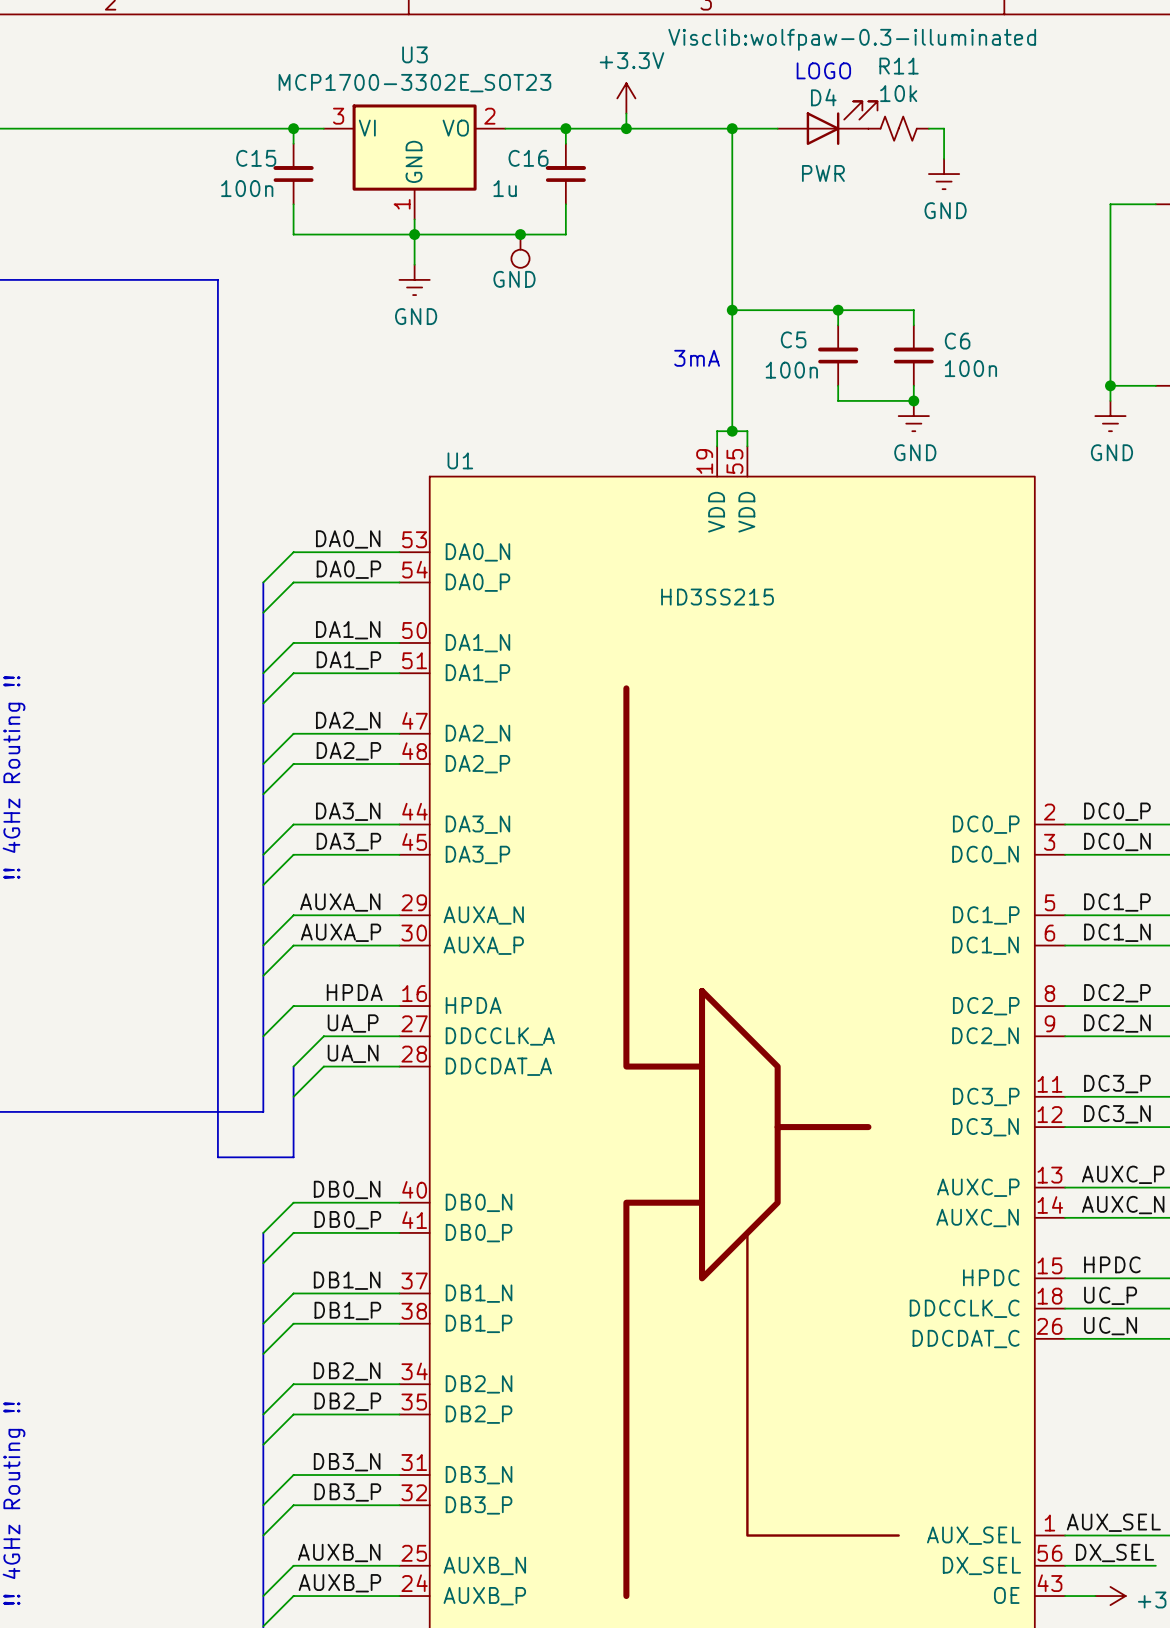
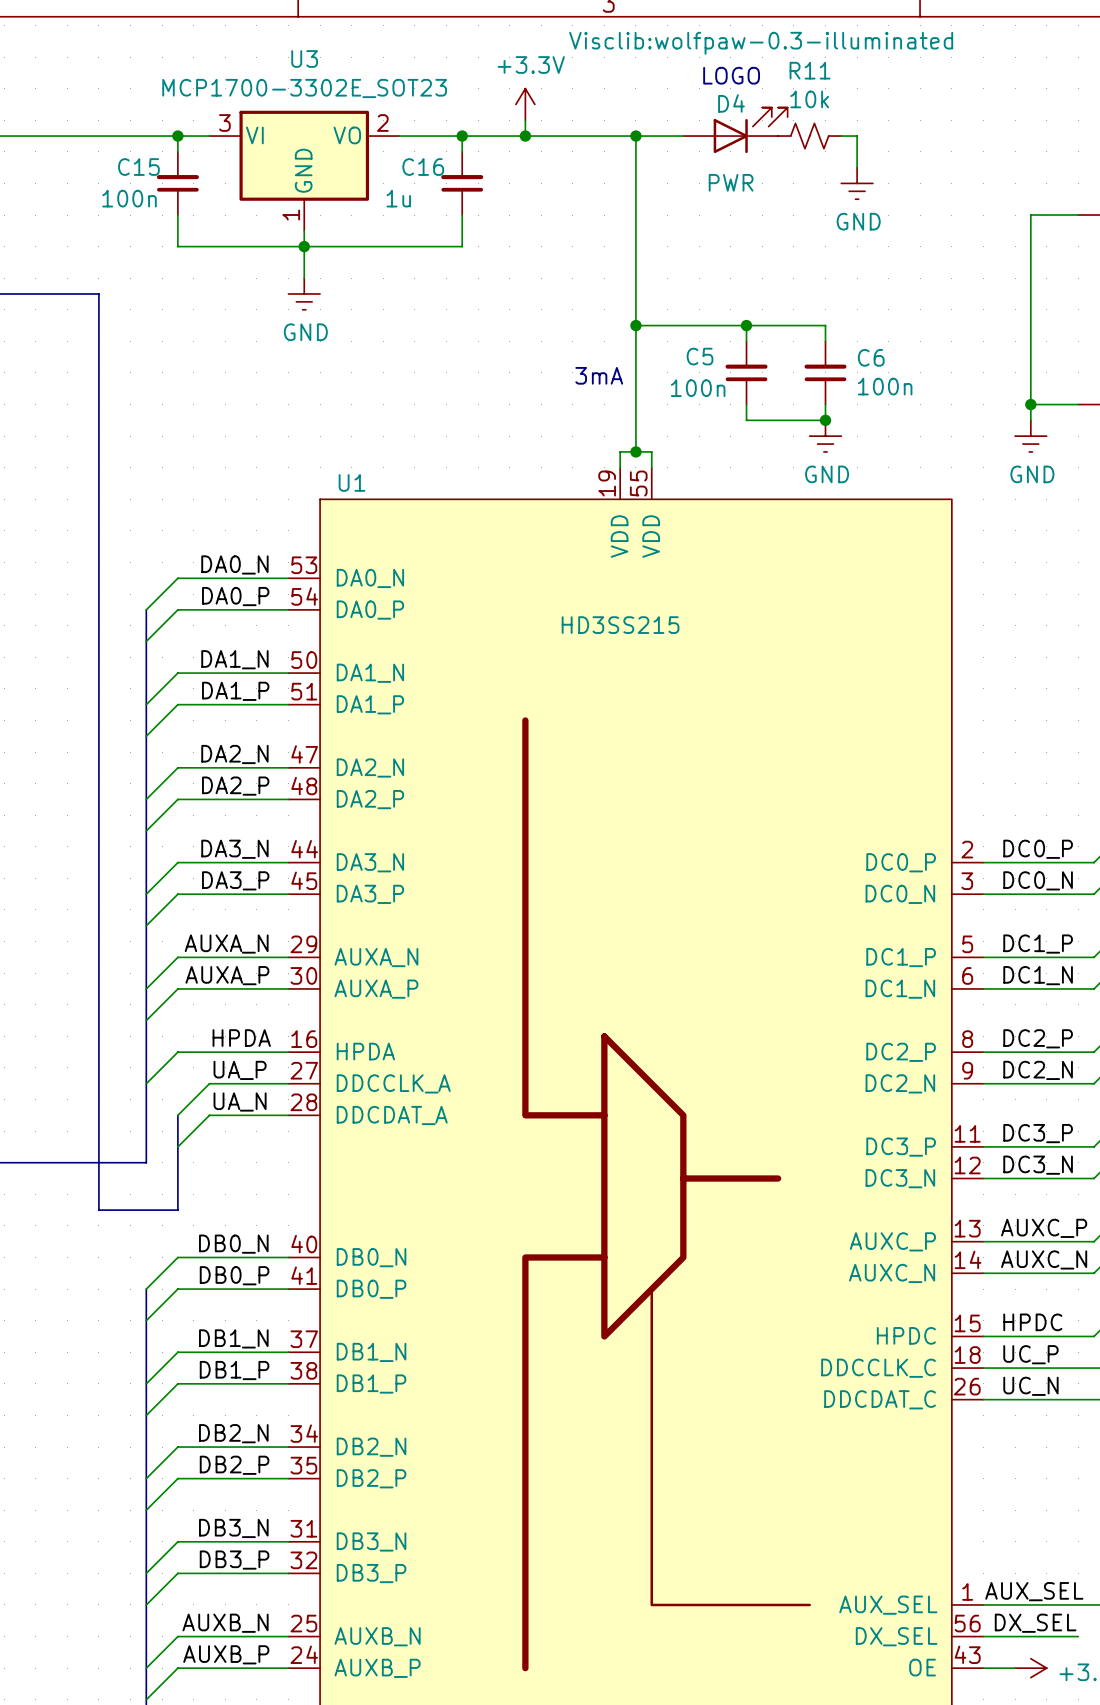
junction: (520, 234) -> none
part: GND (520, 251) -> none

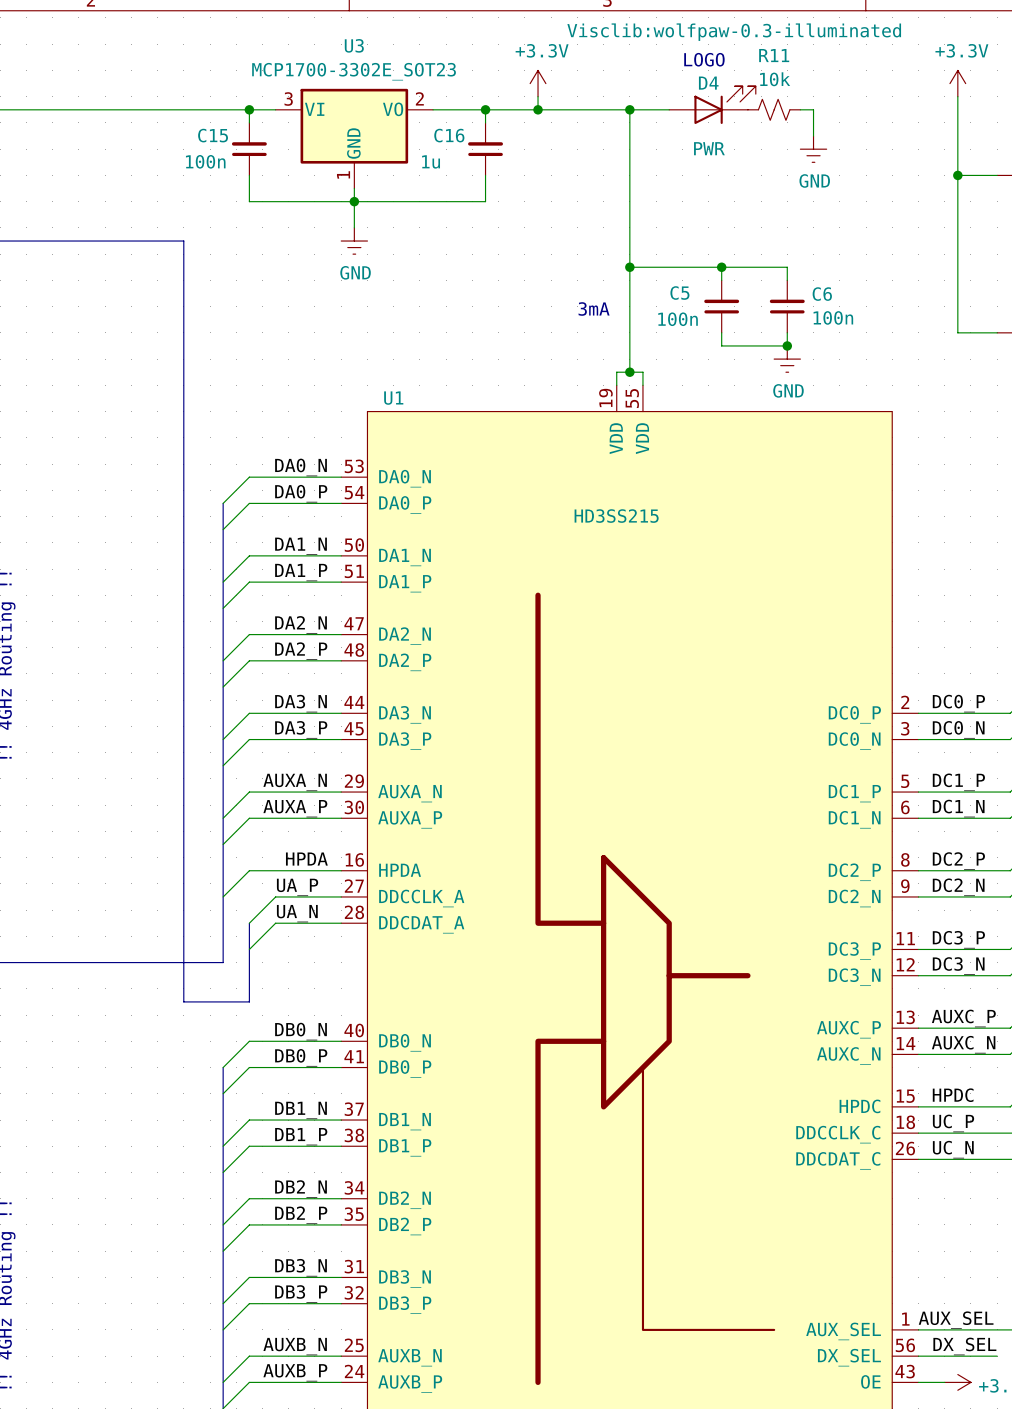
power symbol: none -> +3.3V (957, 83)
wire: none -> (957, 96) (957, 175)
junction: none -> (957, 175)
wire: (1030, 404) (1030, 420) -> none
junction: (1030, 404) -> none
power symbol: GND (1030, 436) -> none

